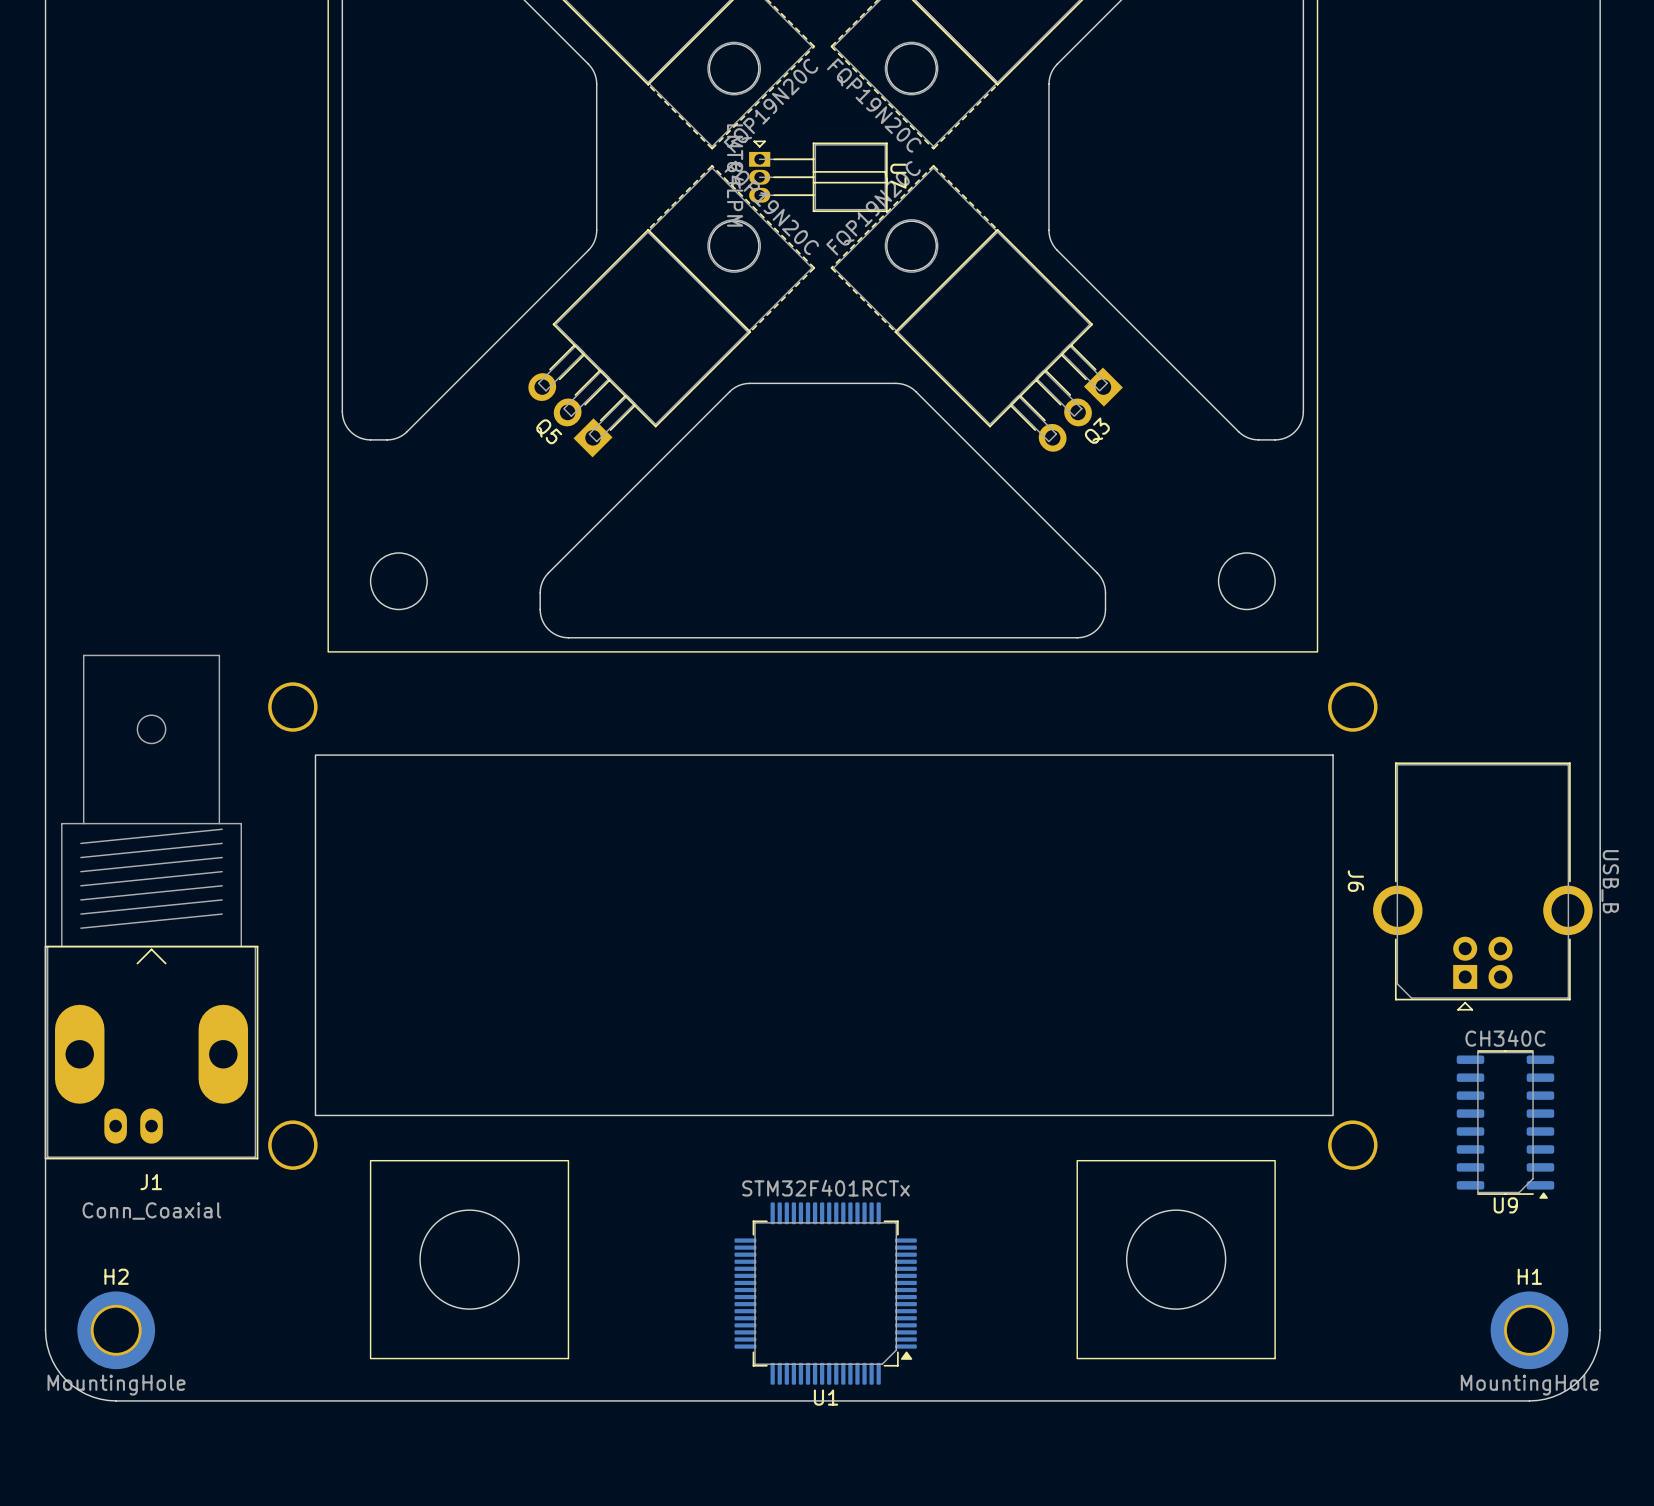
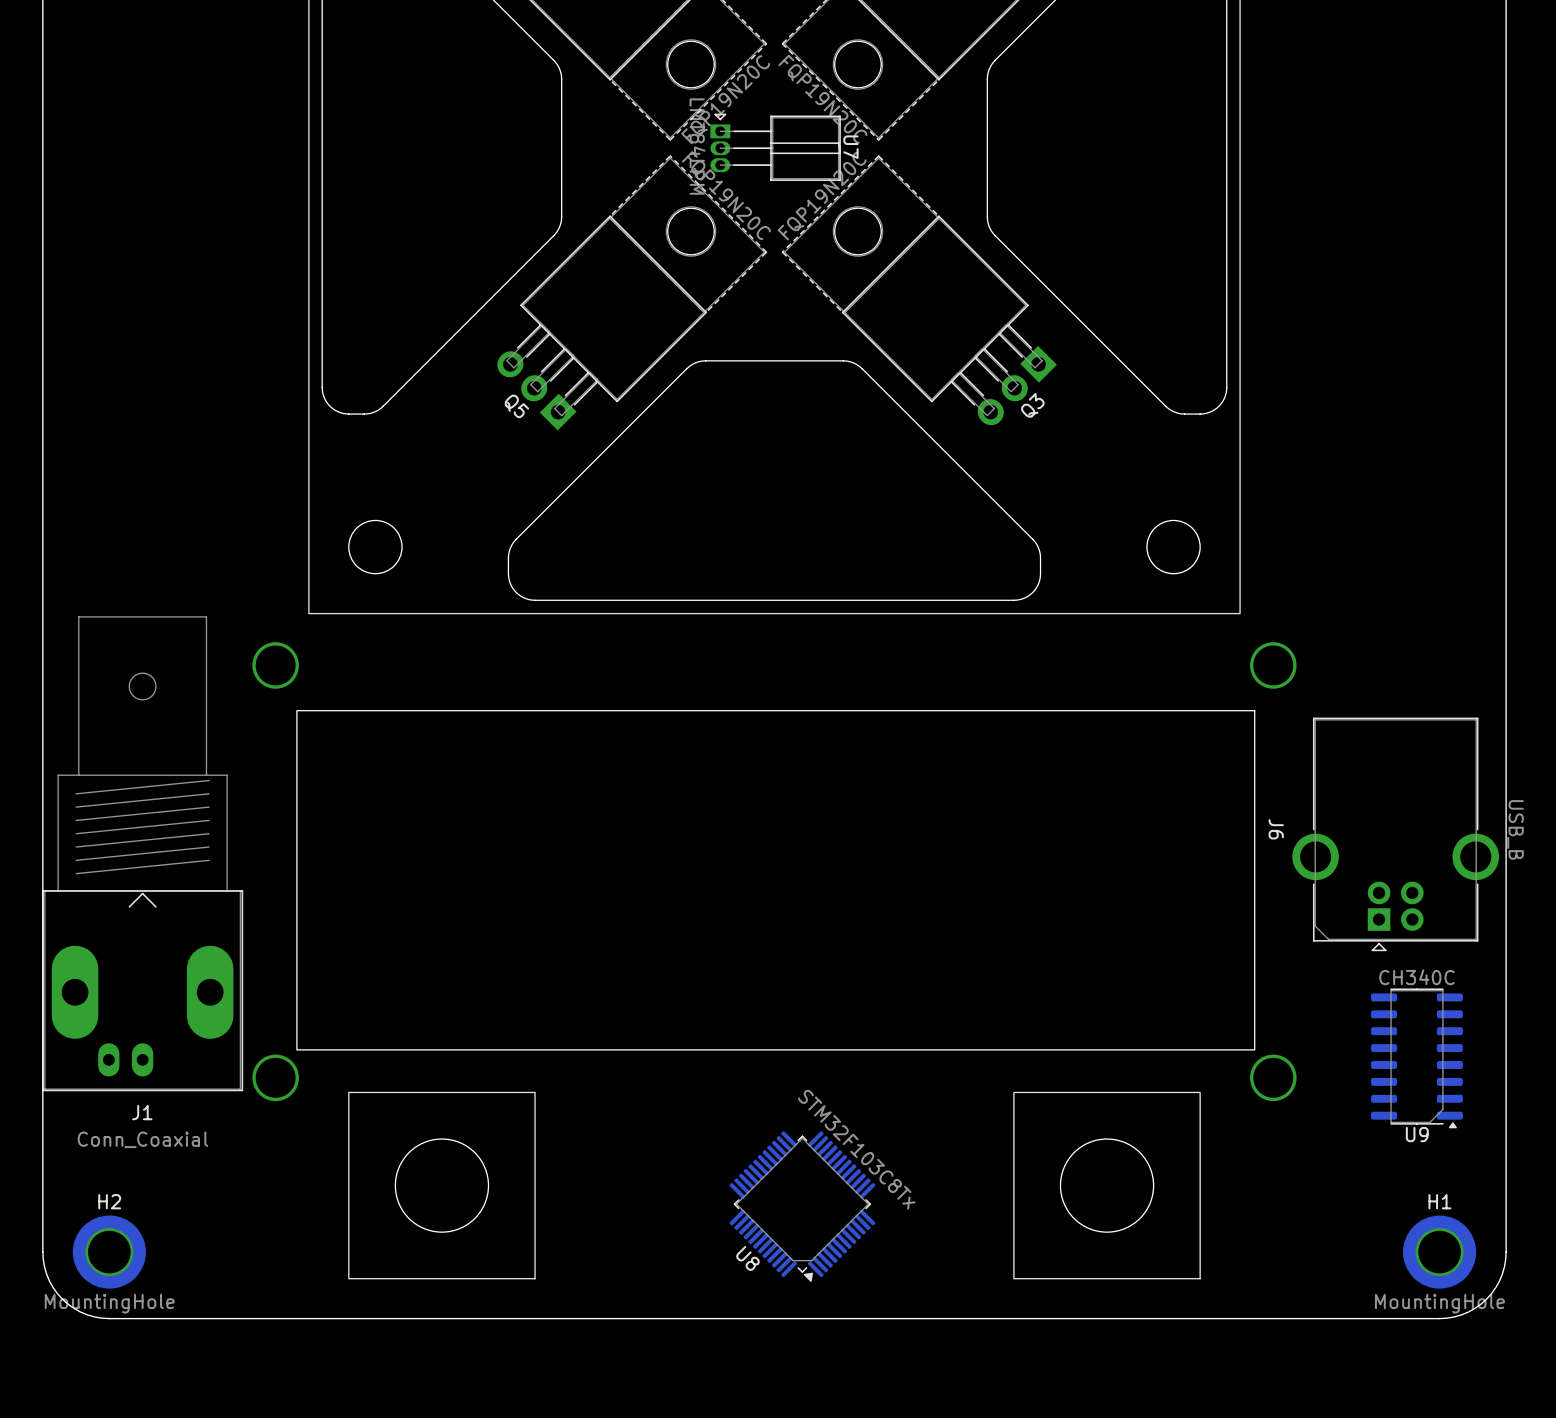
U7 footprint: [749, 140, 888, 213] -> [710, 113, 842, 181]
U8: none -> STM32F103C8Tx (802, 1206)
U1: STM32F401RCTx (825, 1293) -> none

